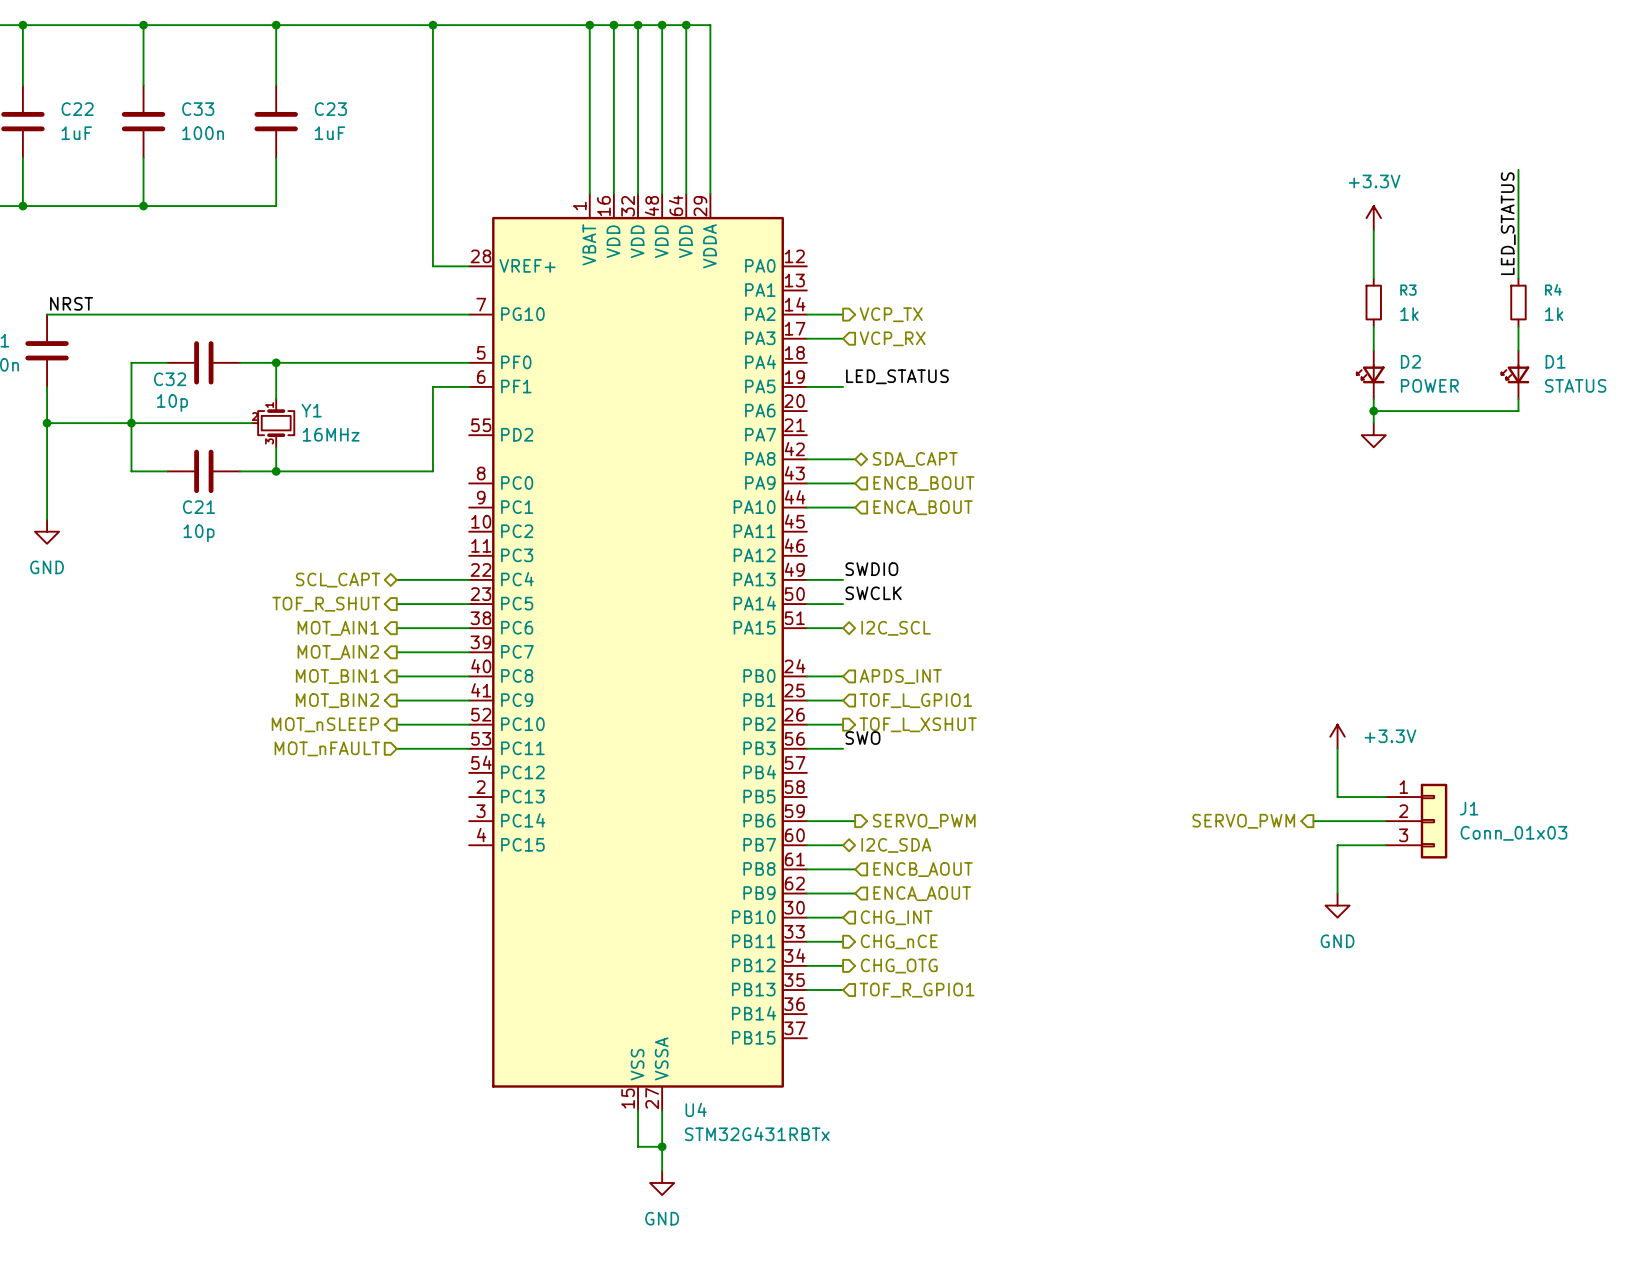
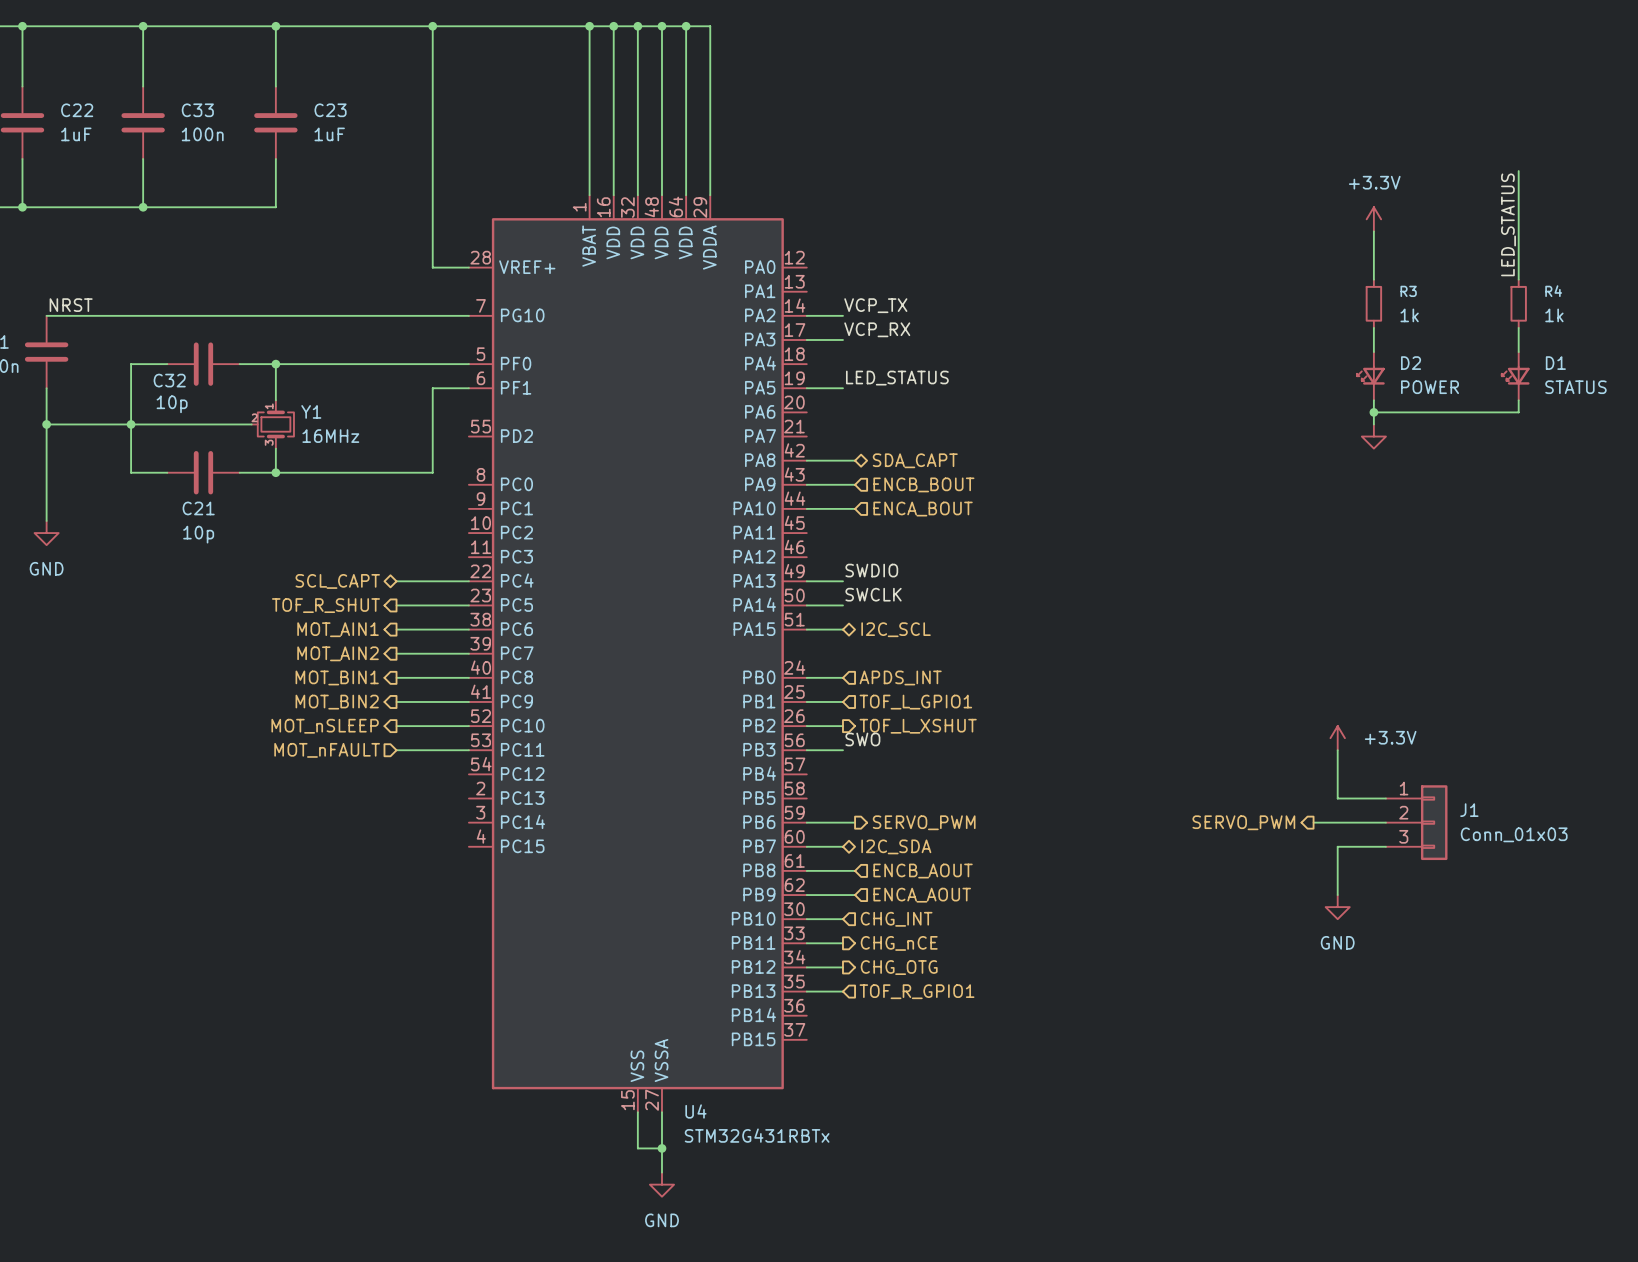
label: none -> VCP_TX (875, 305)
hierarchical label: VCP_TX (891, 314) -> none
label: none -> VCP_RX (877, 329)
hierarchical label: VCP_RX (892, 338) -> none

